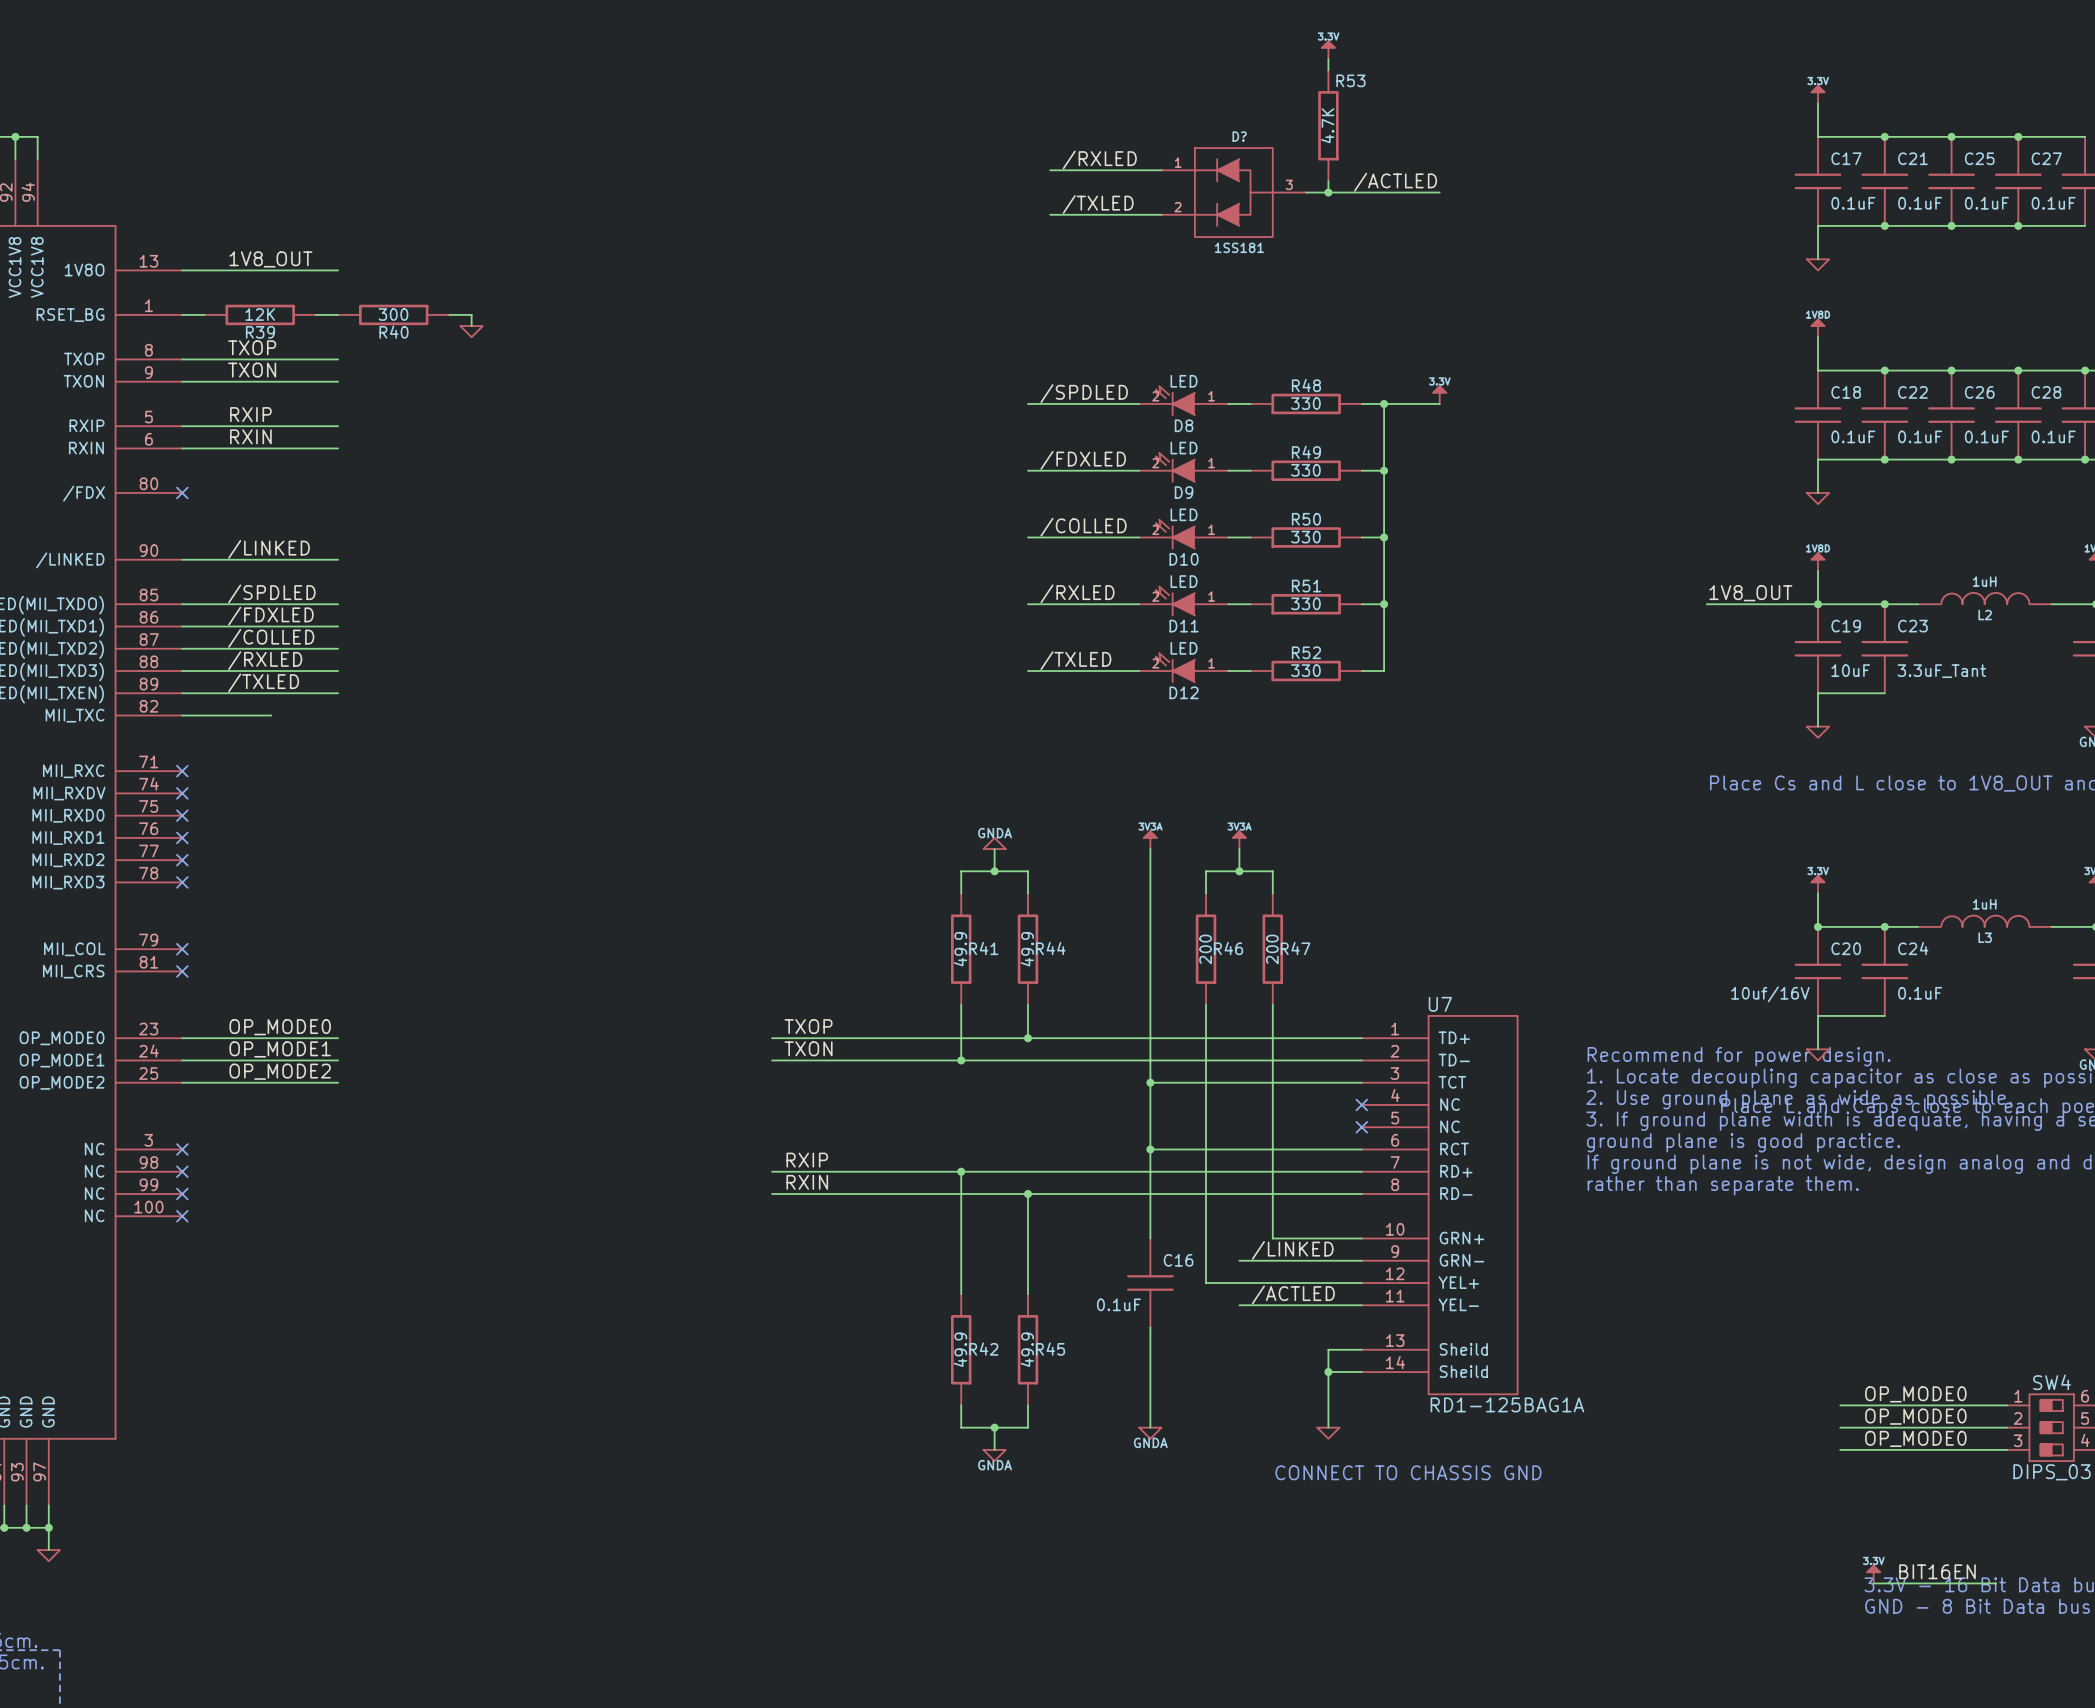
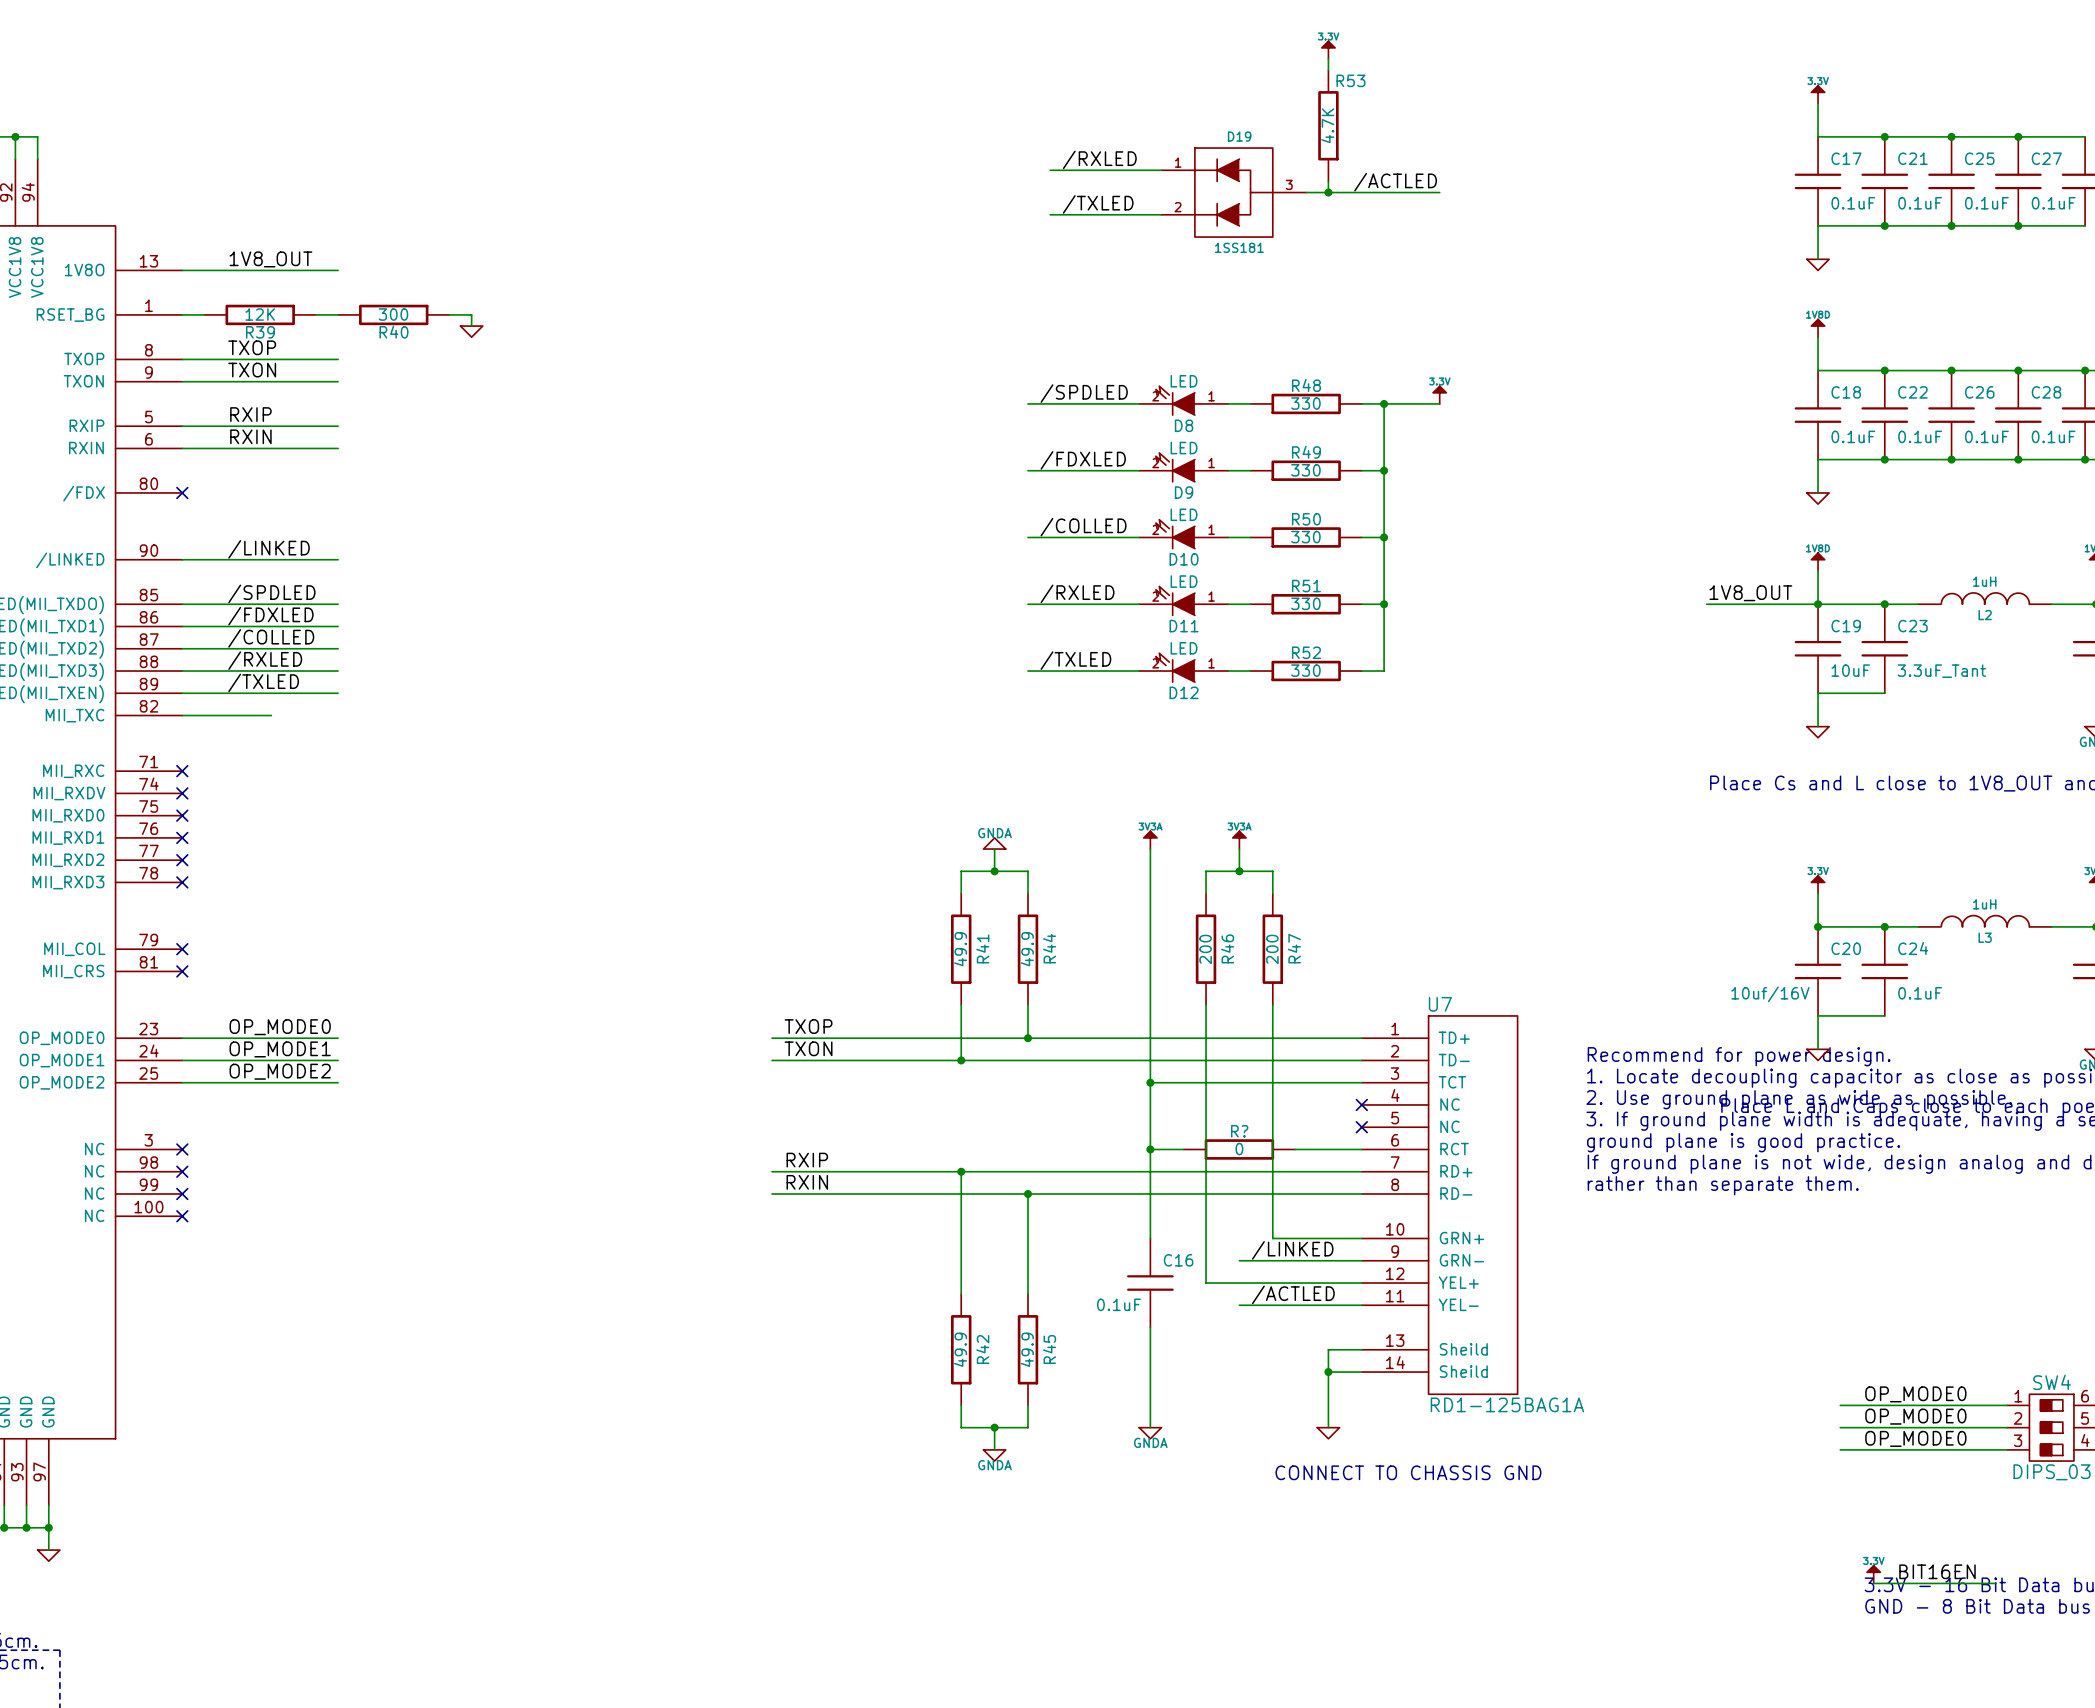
D? name: D? (1239, 136) -> D19 (1239, 136)
R41 name rotation: 0° (983, 948) -> 90° counterclockwise (982, 948)
R44 name rotation: 0° (1050, 948) -> 90° counterclockwise (1049, 948)
R46 name rotation: 0° (1228, 948) -> 90° counterclockwise (1227, 948)
R47 name rotation: 0° (1295, 948) -> 90° counterclockwise (1294, 948)
wire: (1183, 1149) (1295, 1149) -> none
R?: none -> 0 (1239, 1149)
R42 name rotation: 0° (983, 1349) -> 90° counterclockwise (982, 1349)
R45 name rotation: 0° (1050, 1349) -> 90° counterclockwise (1049, 1349)

